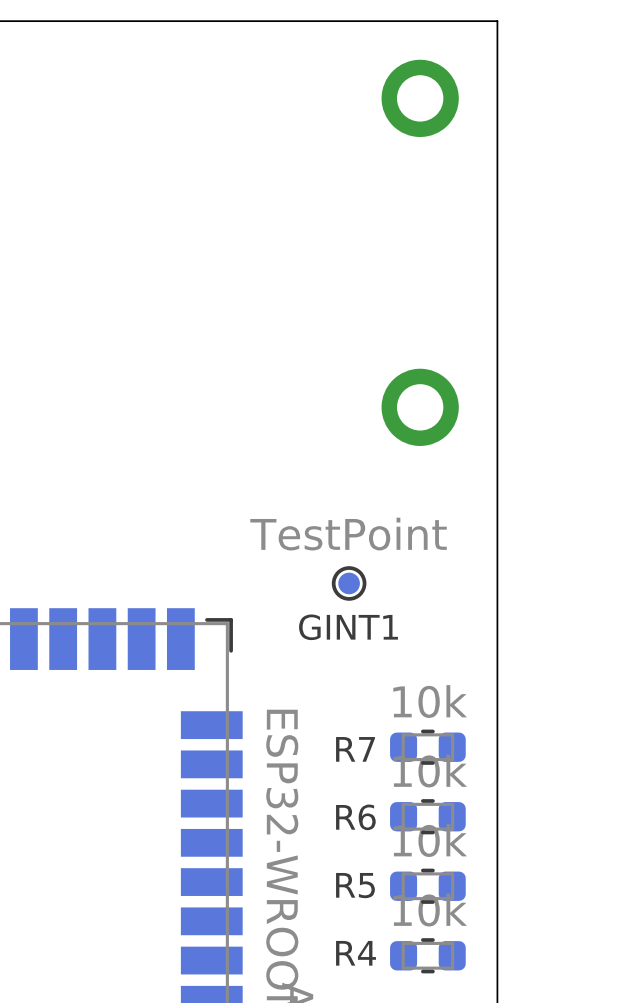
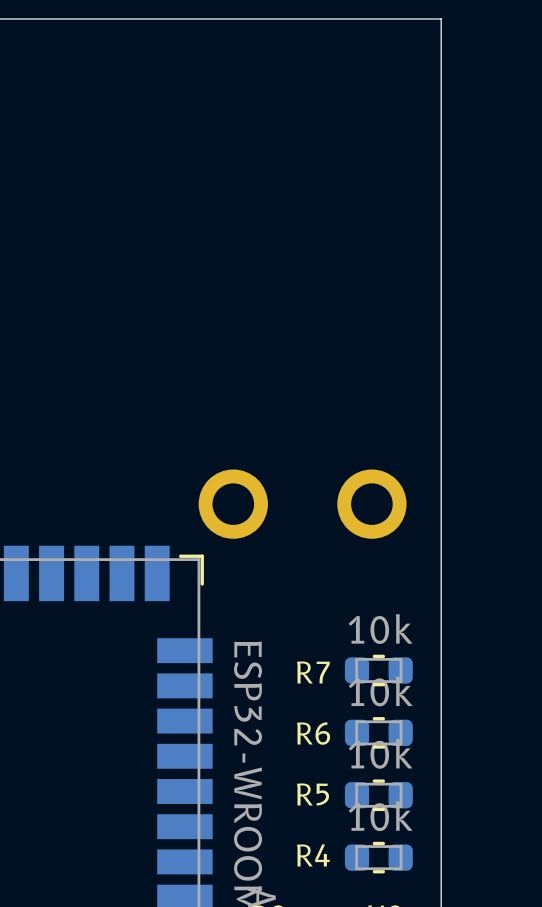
part: (420, 98) -> none
part: (420, 407) -> none
part: none -> (233, 504)
part: none -> (371, 504)
GINT1: TestPoint (349, 583) -> none

